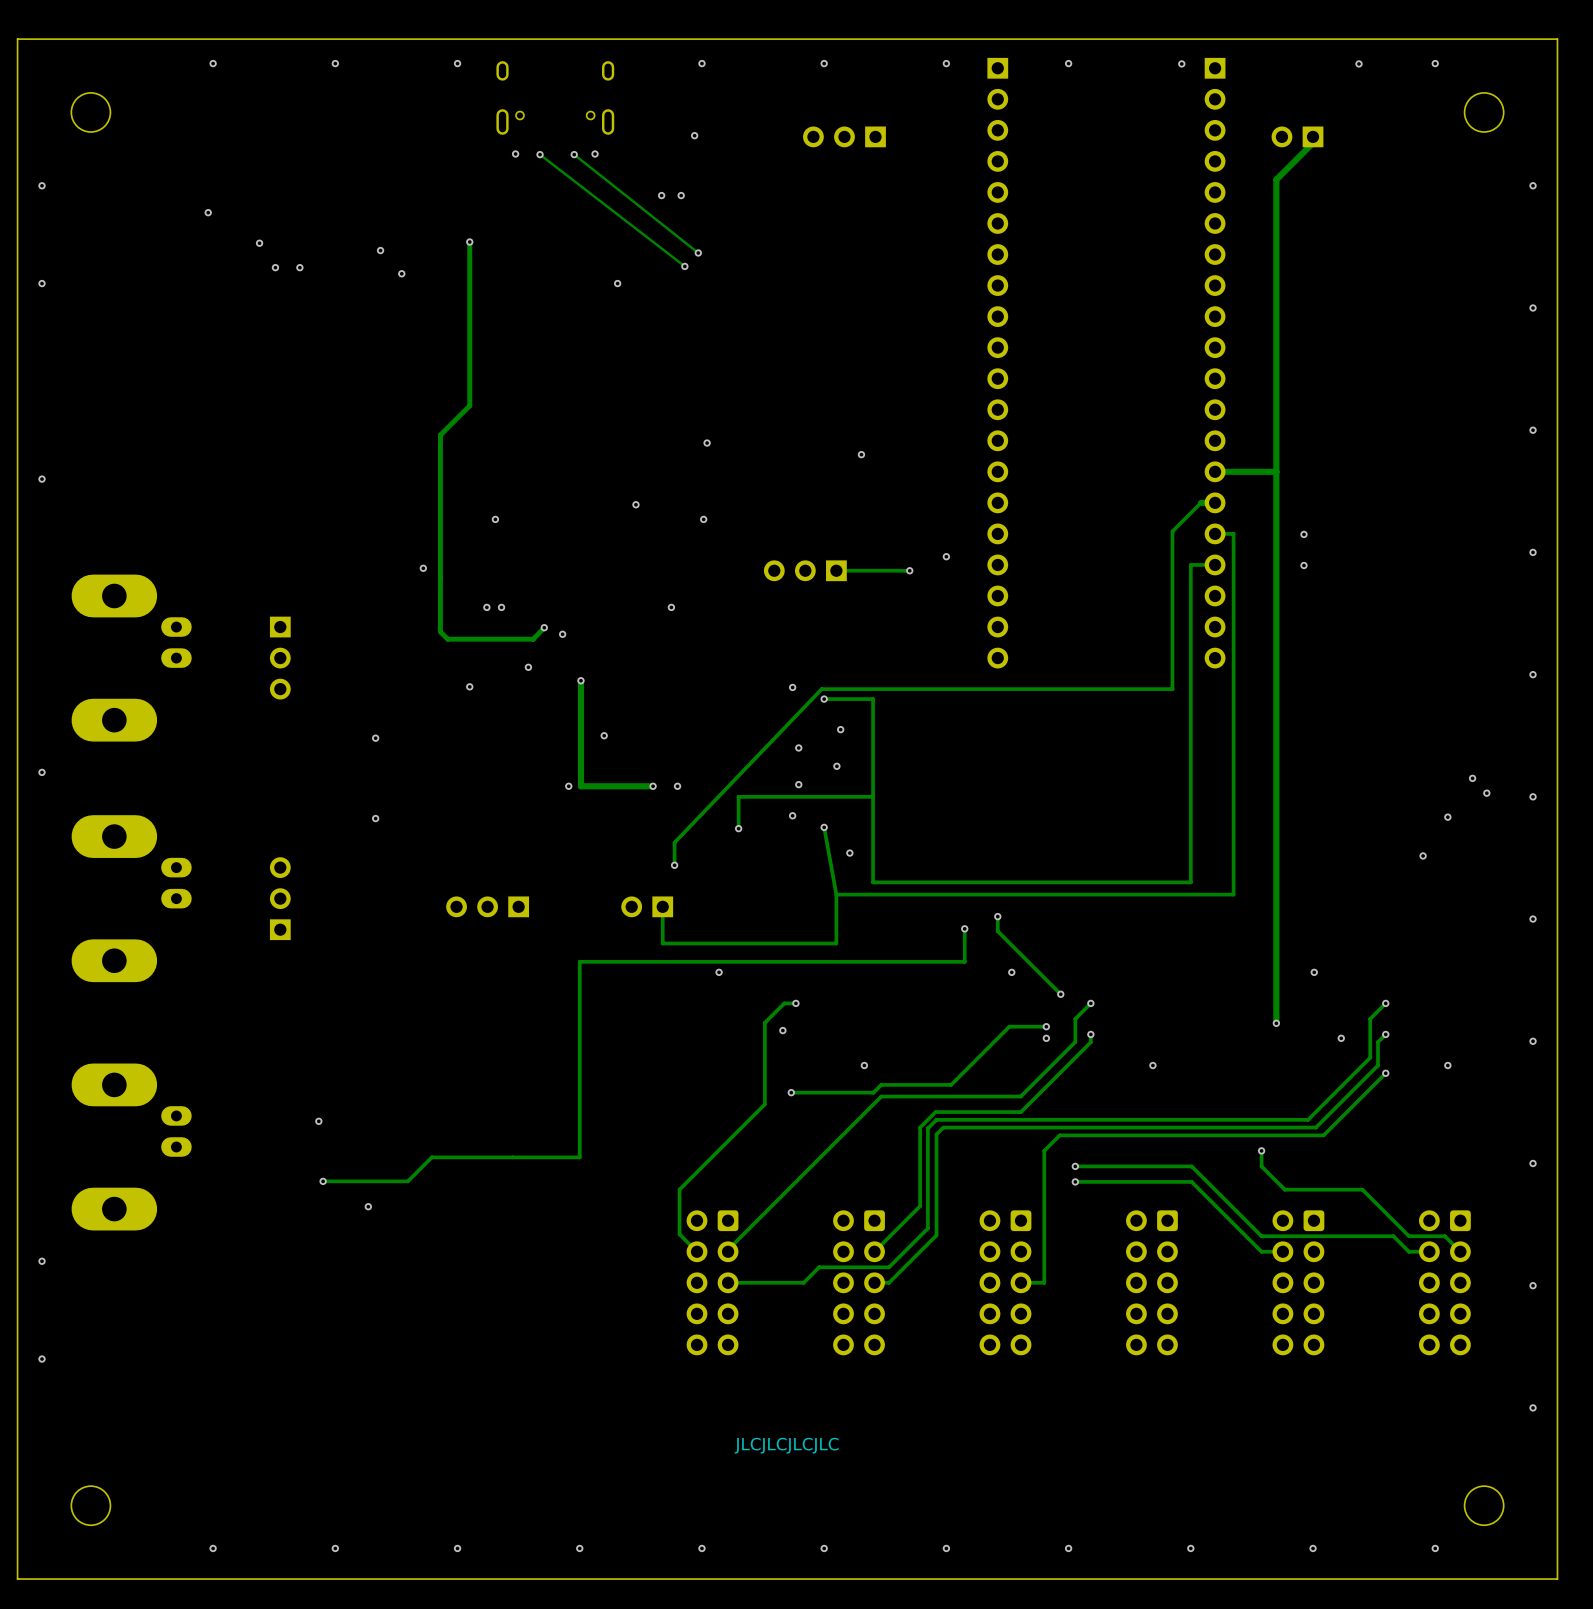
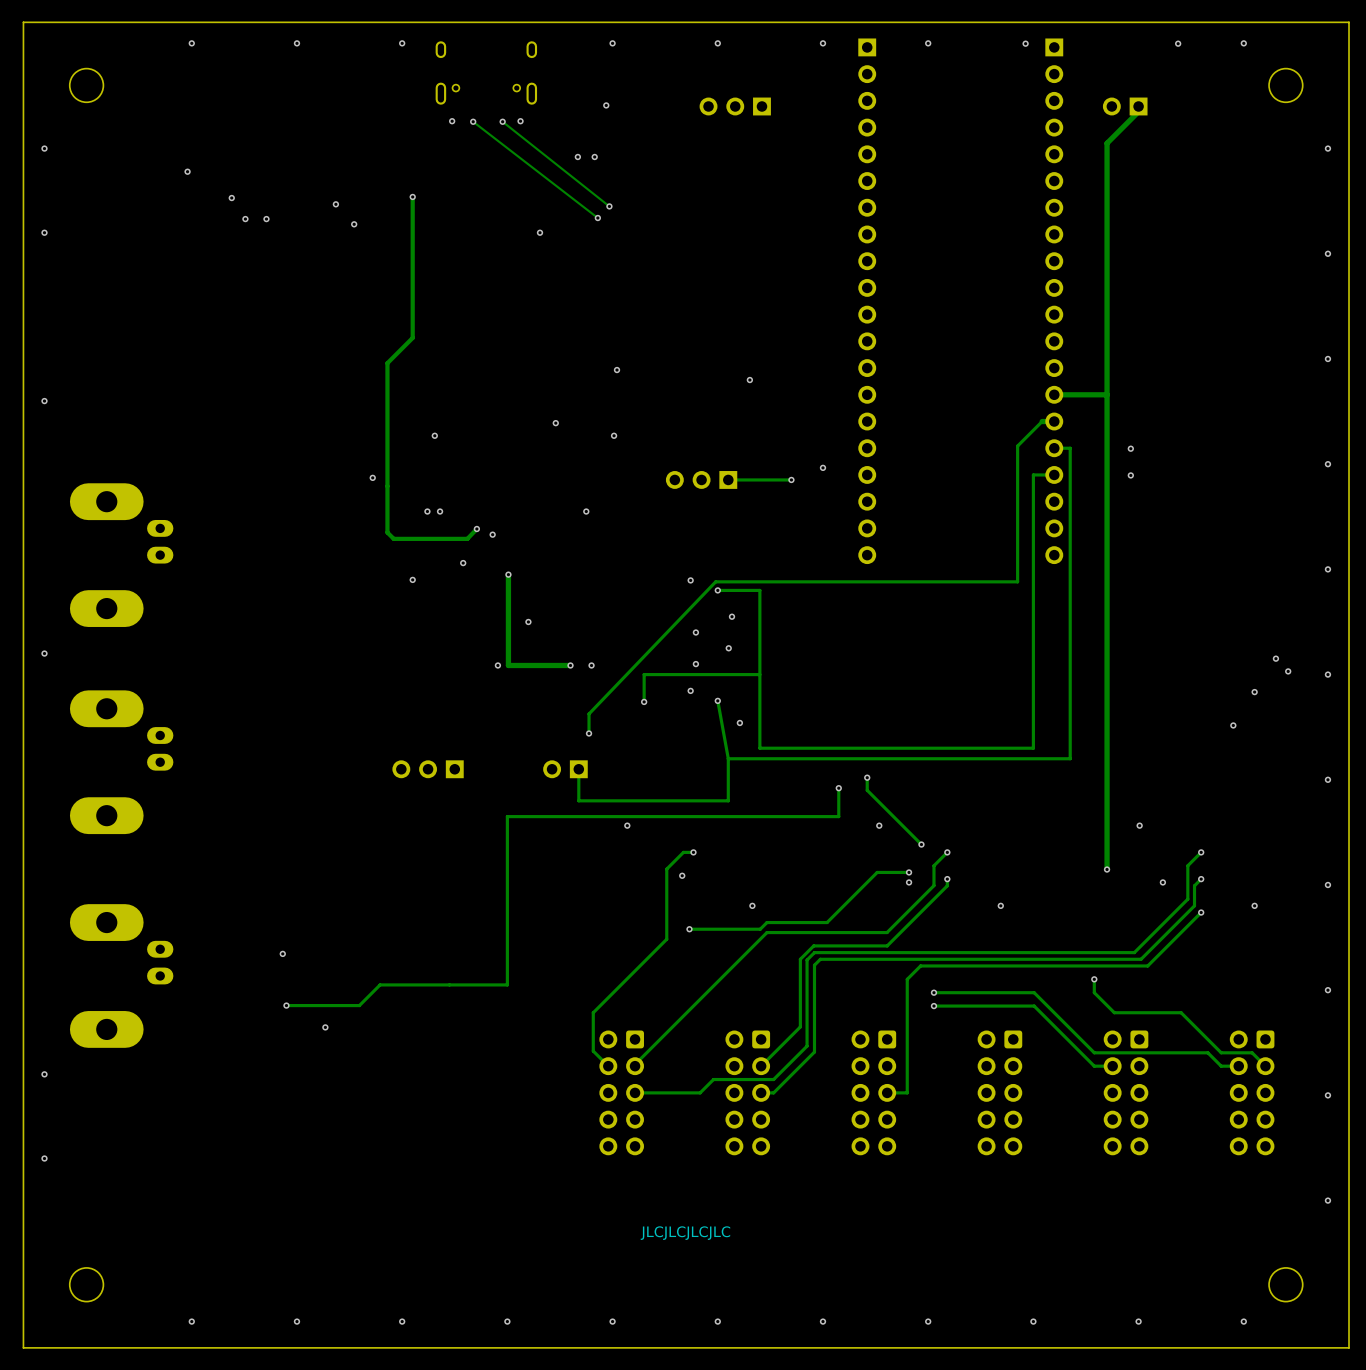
part: (280, 658) -> none
via: (375, 738) -> none
via: (375, 818) -> none
part: (280, 898) -> none

